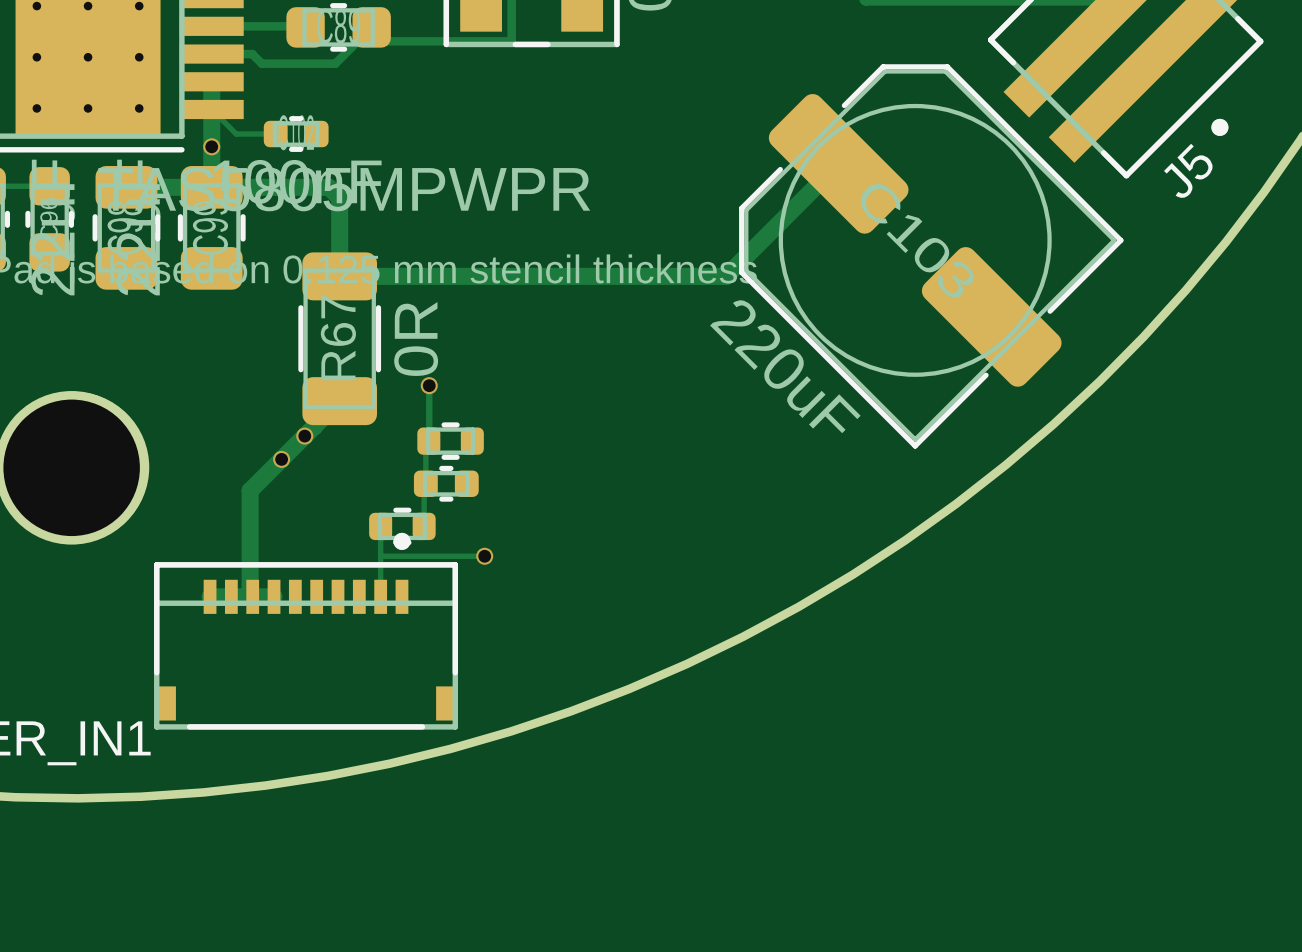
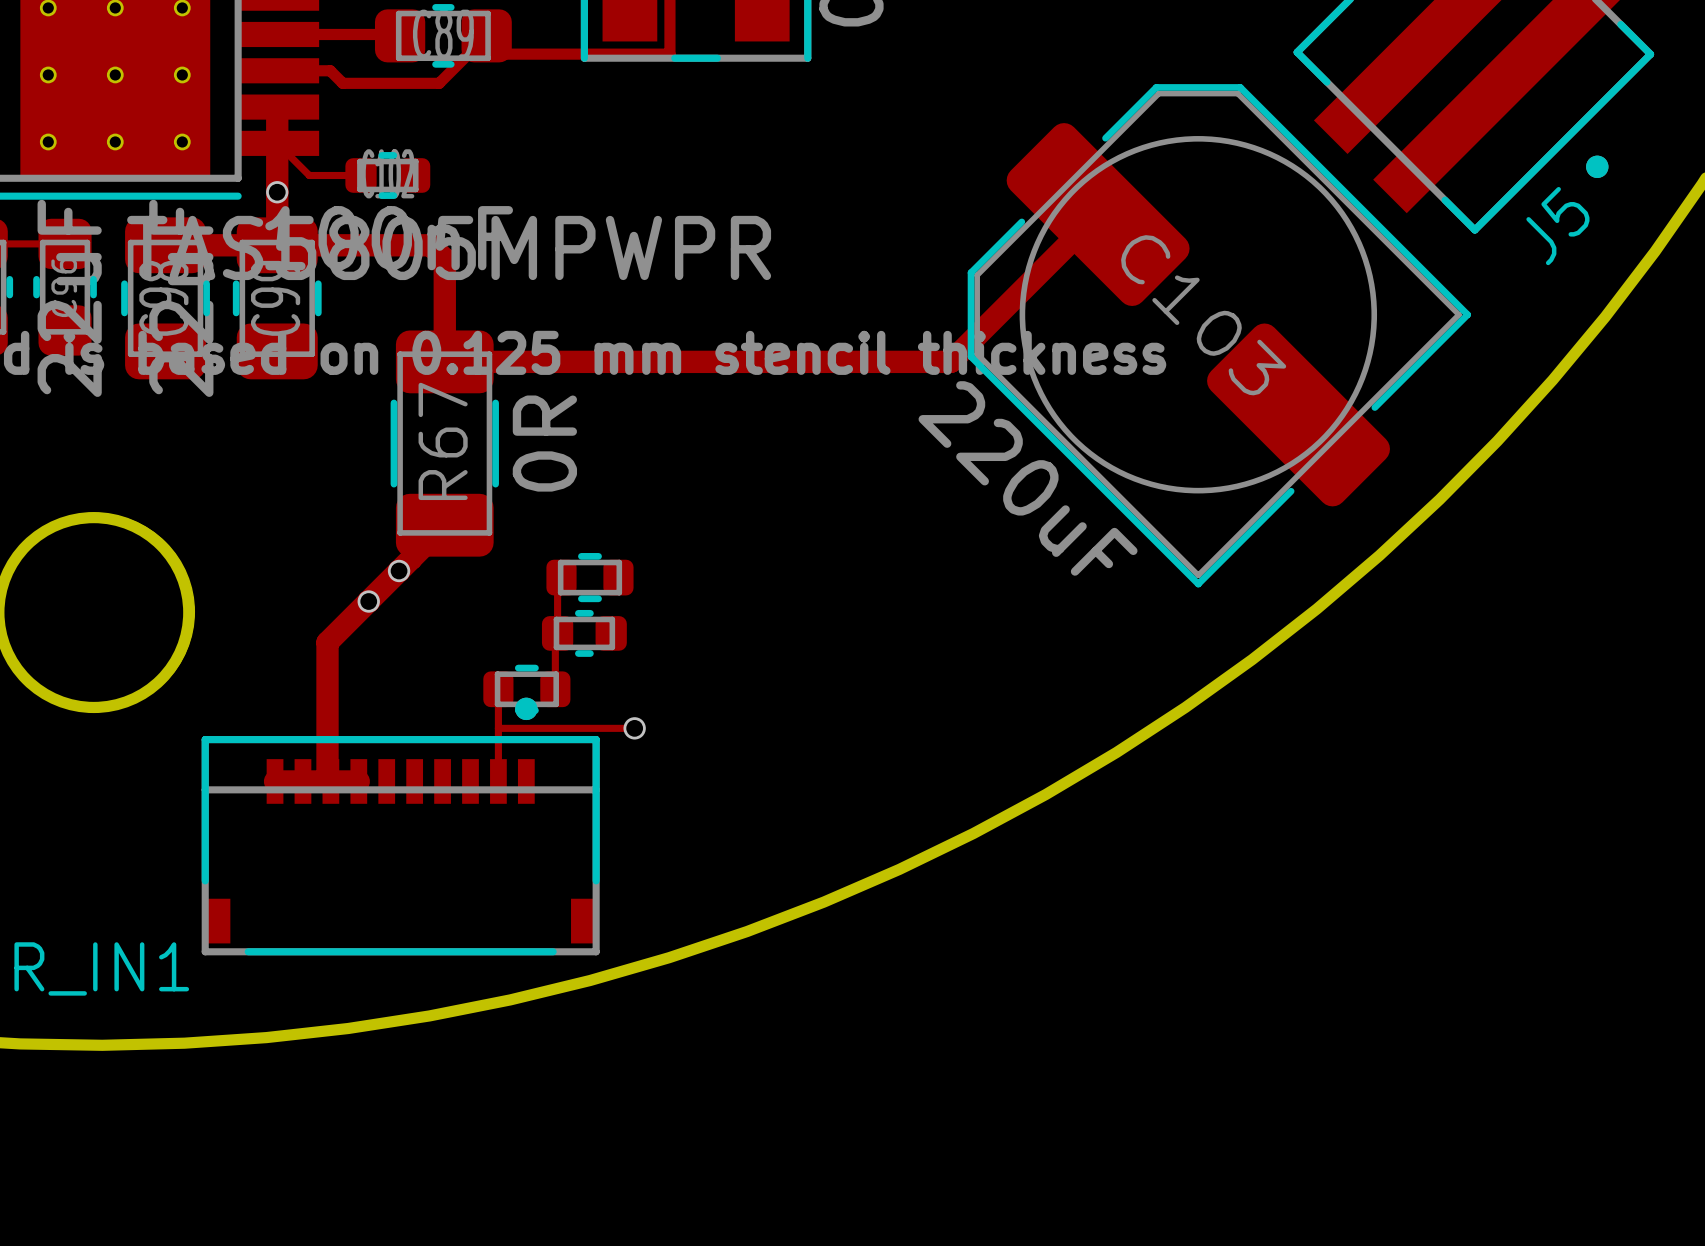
track: (429, 385) (429, 440) -> none
via: (429, 385) -> none

